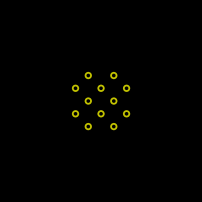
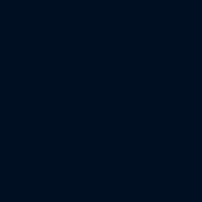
part: (101, 101) -> none

